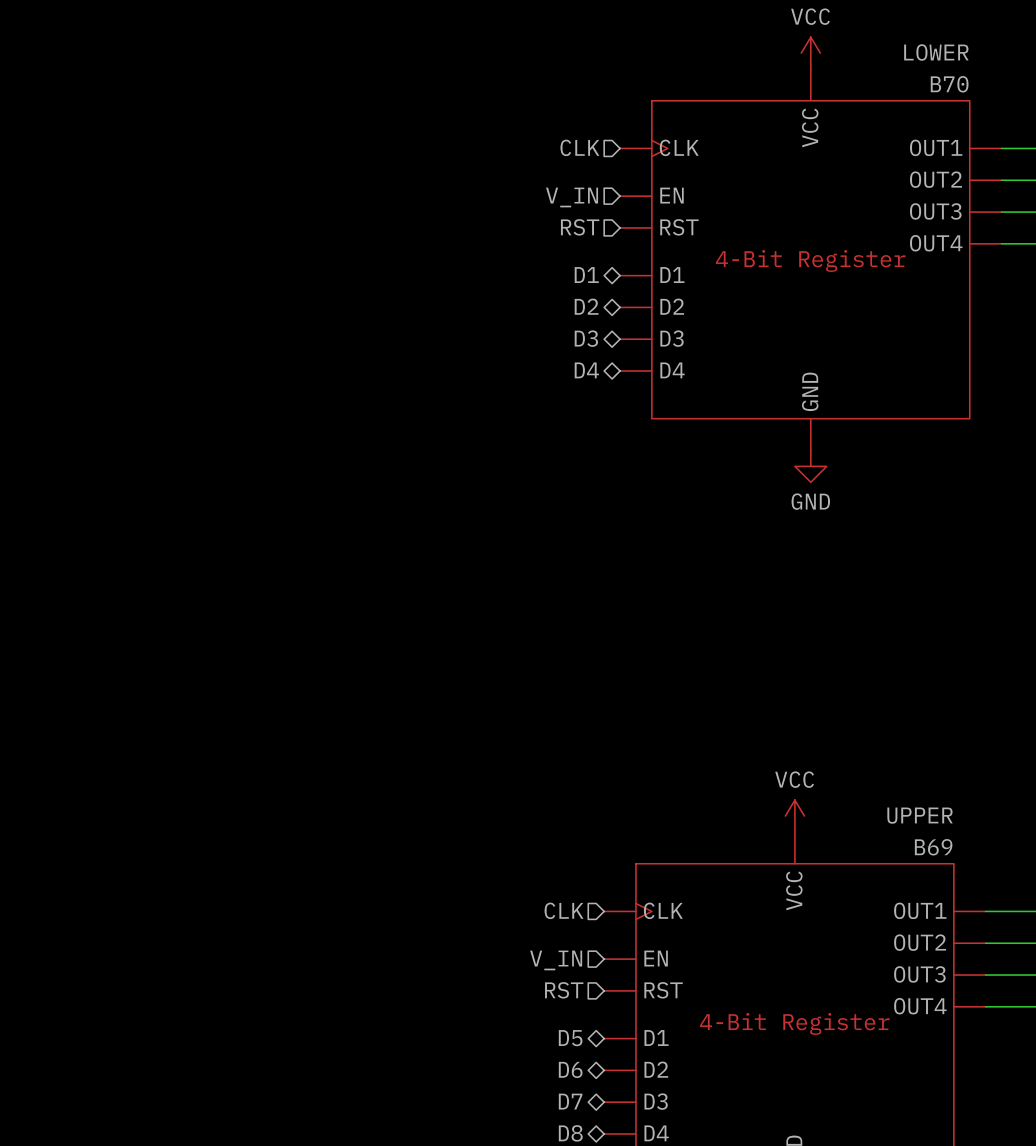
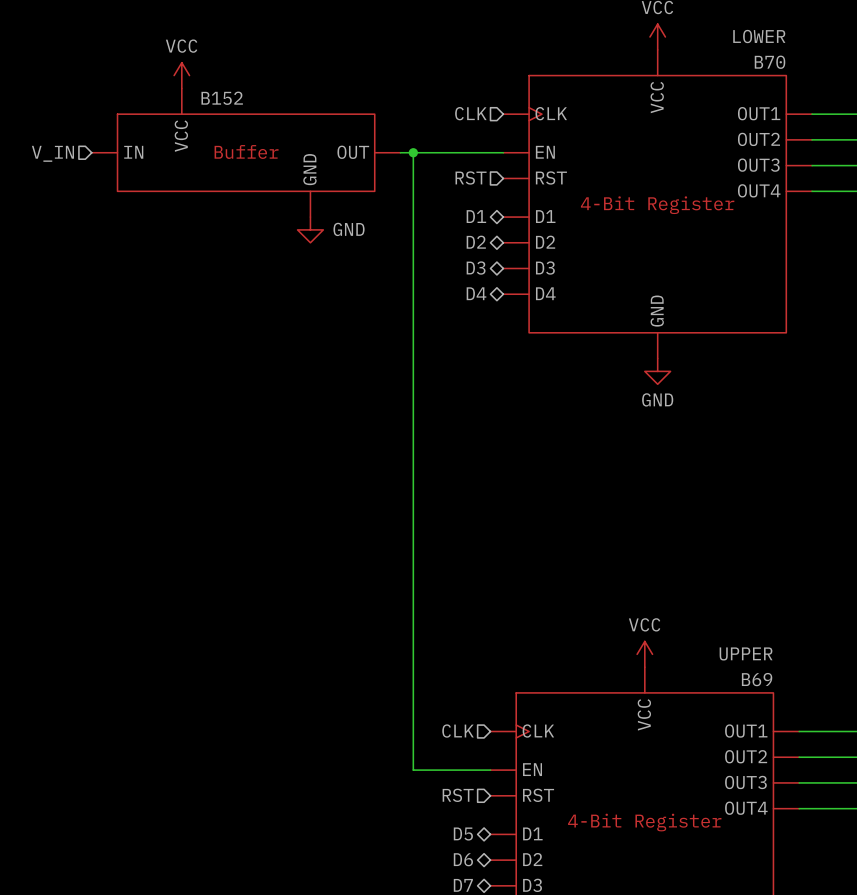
power symbol: none -> VCC (181, 75)
B152: none -> (246, 152)
wire: none -> (400, 152) (503, 152)
wire: none -> (413, 152) (413, 770) (490, 770)
junction: none -> (413, 152)
hierarchical label: none -> V_IN (52, 153)
hierarchical label: V_IN (572, 197) -> none
power symbol: none -> GND (310, 229)
hierarchical label: V_IN (556, 960) -> none

